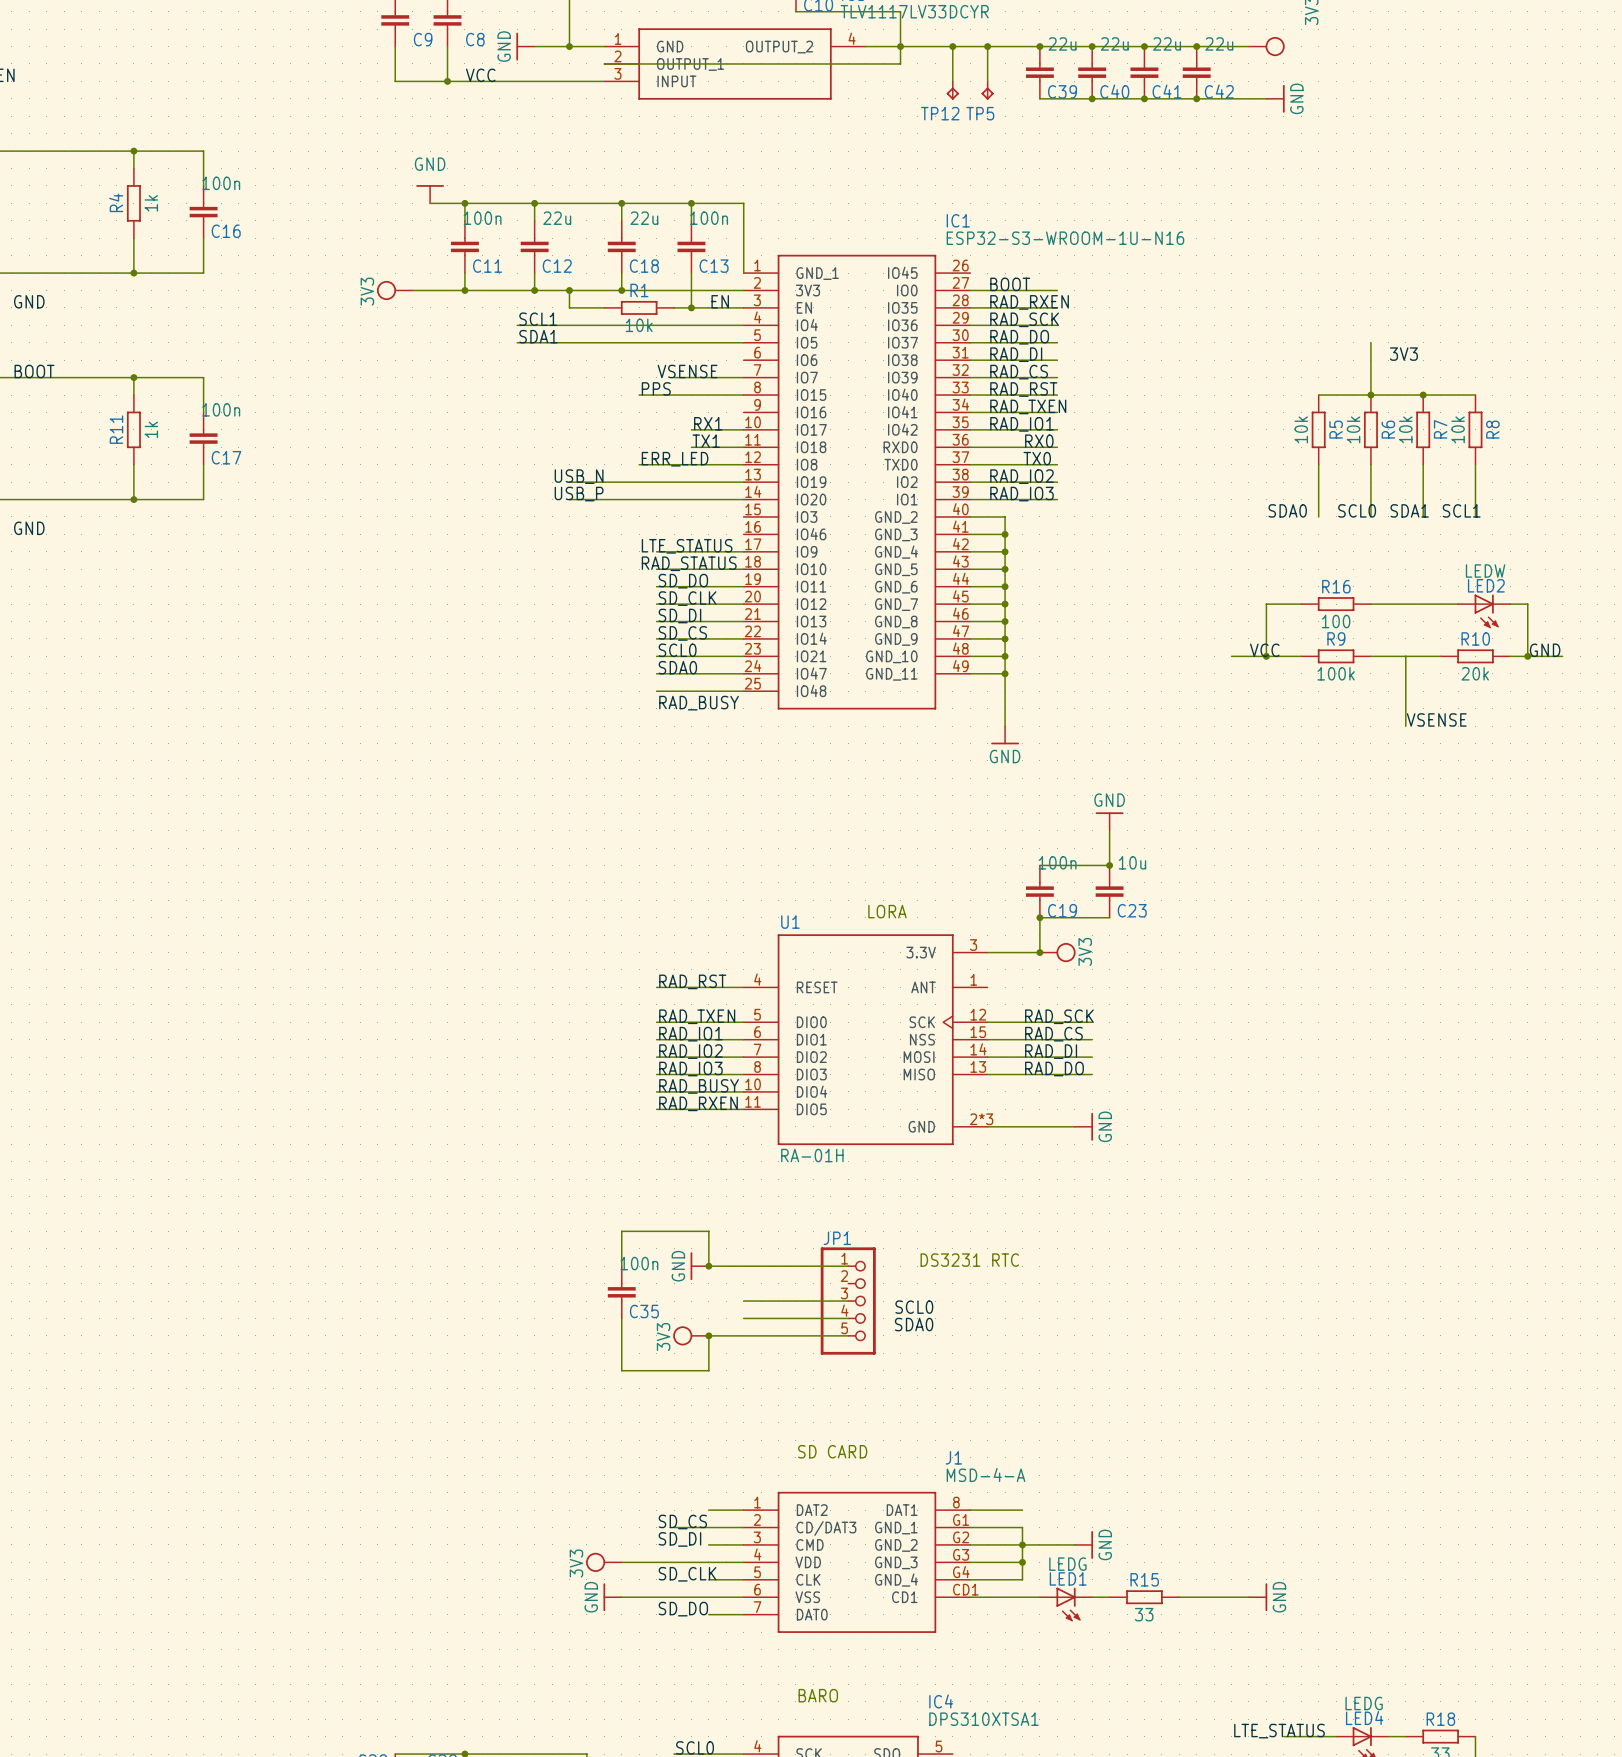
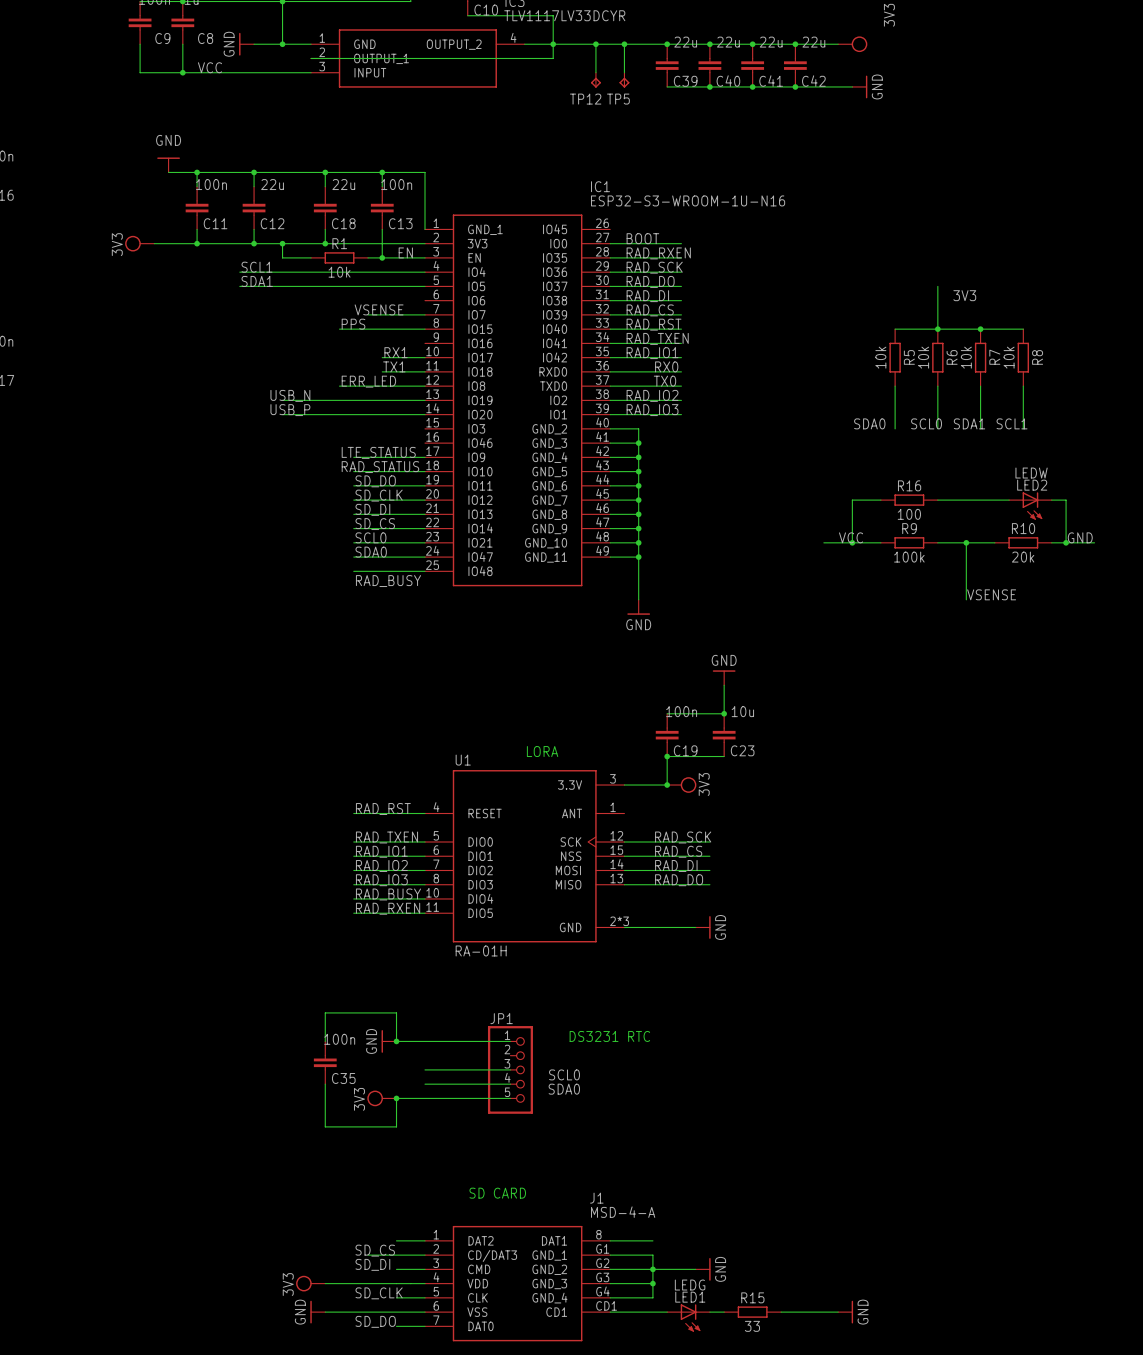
junction: none -> (966, 542)

